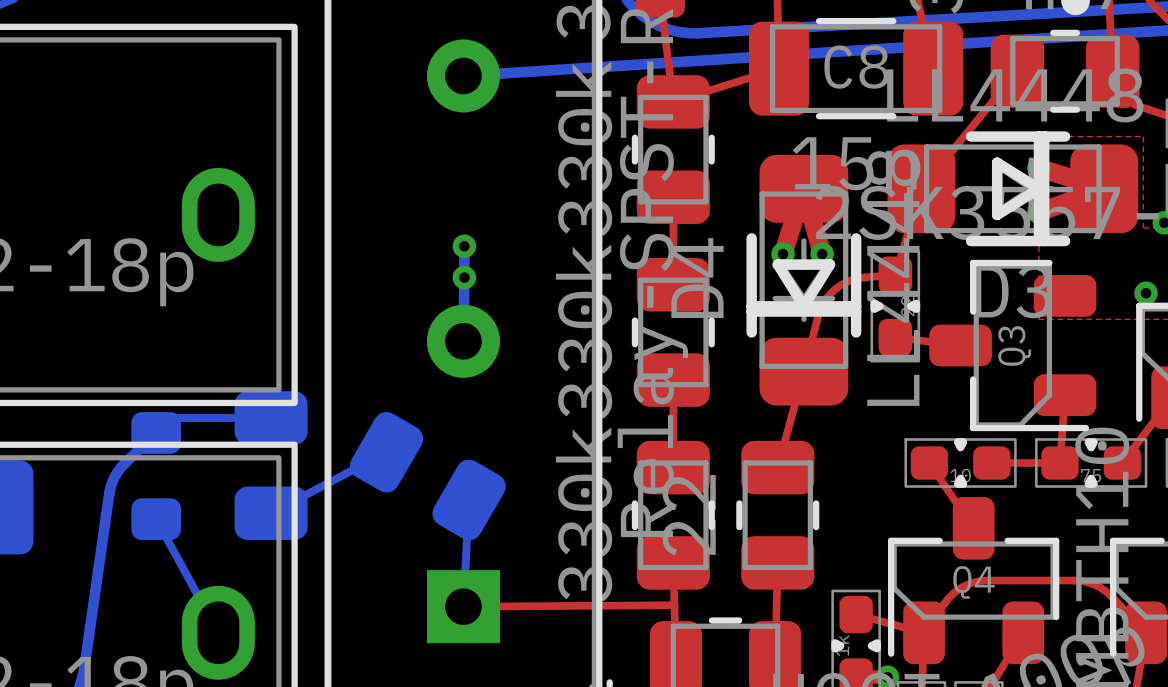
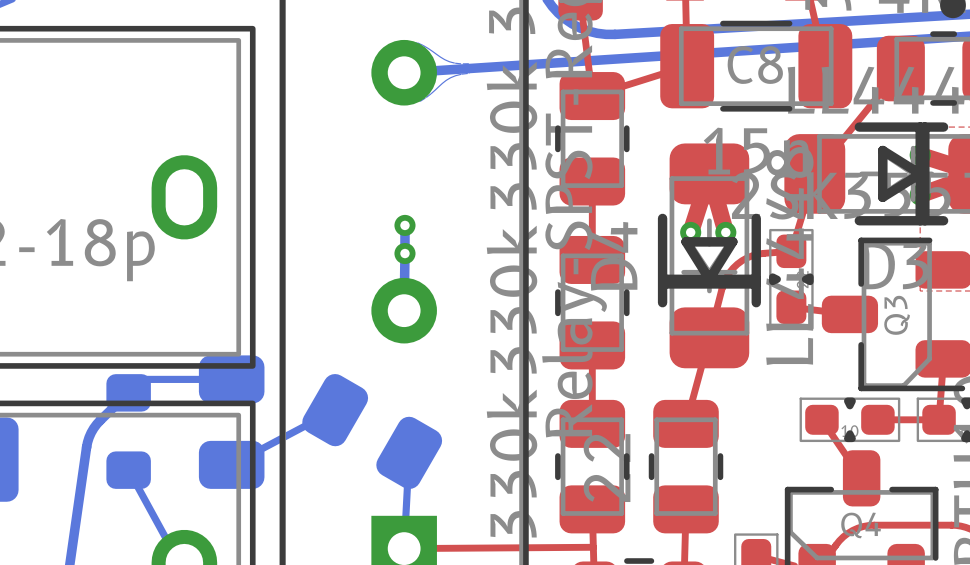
bottom zone outline: none -> (416, 42) (449, 61) (468, 63) (469, 73) (450, 77) (420, 101) (387, 73) (416, 42)

